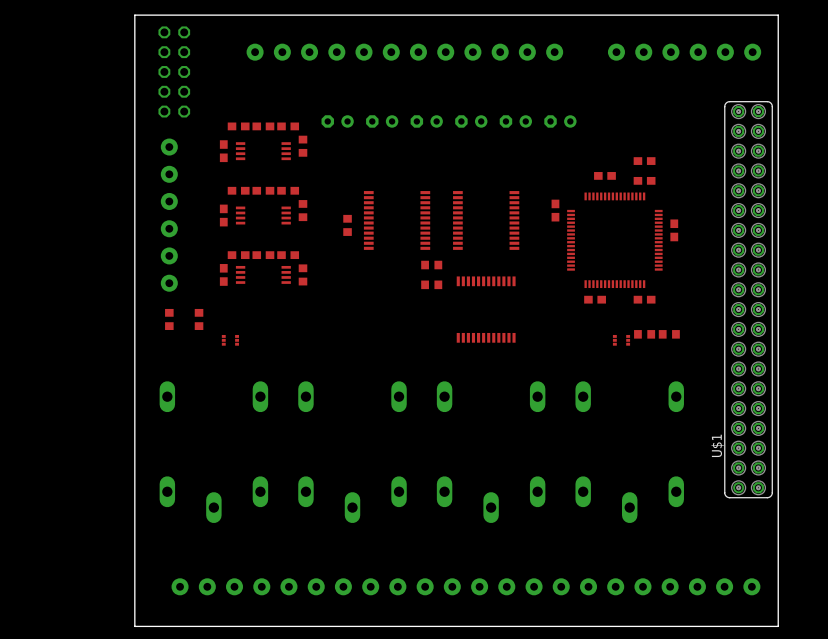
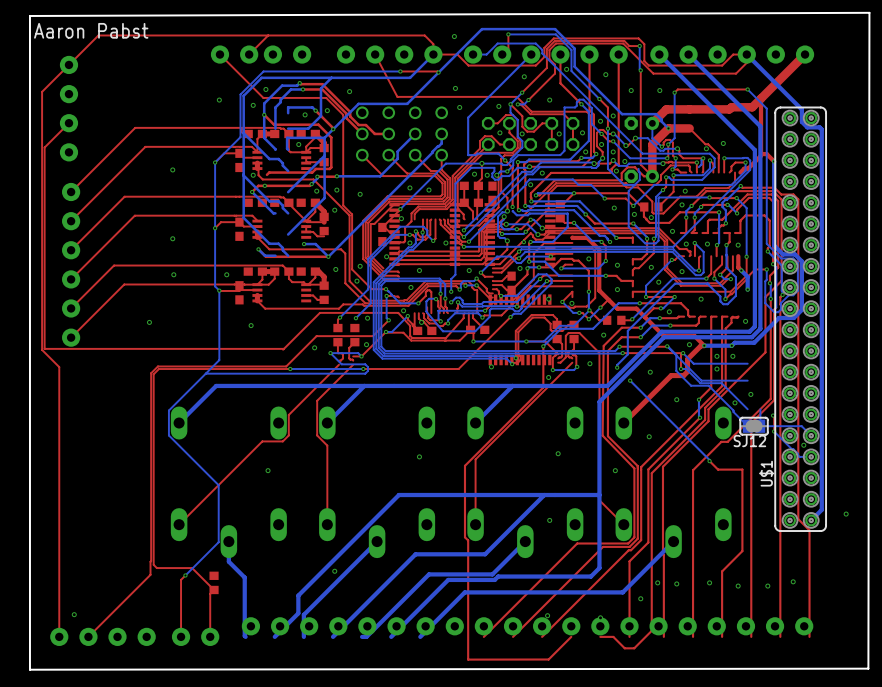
board edge: (778, 15) (134, 15) (134, 626) (778, 626) (778, 15) -> (869, 12) (868, 668) (29, 669) (29, 15) (869, 12)
text: none -> Aaron Pabst (91, 30)
top track: none -> (508, 34) (508, 48) (502, 54)
bottom track: none -> (508, 34) (555, 34) (571, 49) (571, 71) (599, 99)
via: none -> (508, 34)
top track: none -> (268, 35) (249, 54)
via: none -> (454, 36)
top track: none -> (639, 46) (629, 46) (624, 40) (554, 40) (546, 48) (546, 67) (522, 92)
bottom track: none -> (639, 46) (640, 70)
via: none -> (639, 46)
top track: none -> (219, 54) (263, 97) (326, 97) (343, 114) (343, 205) (352, 214) (352, 269) (371, 289) (386, 289)
part: none -> (234, 54)
part position: (323, 52) -> (360, 54)
top track: none -> (375, 54) (397, 96) (516, 96) (531, 111) (586, 111) (590, 115) (590, 158) (582, 166) (529, 166)
part position: (377, 52) -> (418, 54)
bottom track: none -> (433, 54) (410, 77) (261, 77) (243, 95) (243, 217) (269, 243) (278, 243) (288, 255)
part: (432, 52) -> none
bottom track: none -> (473, 54) (486, 54) (497, 43) (535, 43) (542, 49) (542, 53) (642, 153) (709, 153) (714, 158) (714, 167) (702, 179) (671, 179) (666, 177)
part: none -> (487, 54)
part: (486, 52) -> none
bottom track: none -> (531, 54) (468, 117) (468, 155) (498, 153) (505, 160)
part: none -> (545, 54)
top track: none -> (560, 54) (560, 83) (581, 104)
part: (541, 52) -> none
top track: none -> (589, 54) (589, 110) (593, 114) (593, 151) (596, 154)
part: none -> (604, 54)
top track: none -> (618, 54) (618, 164) (616, 164) (610, 172)
bottom track: none -> (659, 54) (754, 150) (754, 326) (749, 331) (661, 331) (607, 385) (216, 385) (179, 423)
bottom track: none -> (688, 54) (760, 126) (760, 328) (751, 337) (664, 337) (599, 401) (599, 568) (590, 576) (498, 576) (494, 579) (448, 579) (391, 636)
bottom track: none -> (746, 54) (801, 109) (801, 121) (807, 127) (819, 127) (821, 129) (821, 509) (811, 520)
top track: none -> (805, 54) (752, 107) (731, 107) (729, 109) (666, 109) (652, 123)
via: none -> (566, 69)
top track: none -> (400, 71) (438, 72)
bottom track: none -> (400, 71) (263, 71) (240, 94) (240, 137) (215, 162) (215, 286) (219, 290) (219, 360) (168, 410) (168, 435) (218, 485) (218, 542) (185, 575)
via: none -> (400, 71)
top track: none -> (640, 70) (640, 164) (652, 176)
via: none -> (640, 70)
via: none -> (438, 72)
via: none -> (605, 74)
part: (174, 71) -> none
via: none -> (524, 76)
bottom track: none -> (331, 77) (320, 88) (320, 115) (308, 128) (288, 128)
part: none -> (68, 79)
top track: none -> (299, 83) (322, 84) (350, 111) (350, 116) (358, 125) (365, 125) (374, 133) (388, 133)
bottom track: none -> (299, 83) (297, 85) (282, 85) (264, 103) (264, 137) (275, 149)
via: none -> (299, 83)
via: none -> (455, 88)
via: none -> (265, 89)
top track: none -> (302, 89) (322, 89) (346, 113) (346, 118) (362, 133)
bottom track: none -> (302, 89) (291, 89) (280, 99) (275, 107) (275, 128)
via: none -> (302, 89)
top track: none -> (747, 89) (677, 89) (674, 92)
bottom track: none -> (747, 89) (766, 108) (766, 243) (781, 258) (793, 258) (797, 263) (797, 290) (793, 295) (788, 295) (780, 303) (780, 309) (778, 312) (774, 312) (765, 303) (766, 269)
via: none -> (747, 89)
via: none -> (631, 90)
via: none -> (659, 90)
via: none -> (349, 91)
bottom track: none -> (522, 92) (510, 104) (510, 112) (517, 119) (517, 136) (522, 141) (522, 147) (507, 165) (445, 163) (400, 209)
via: none -> (522, 92)
bottom track: none -> (674, 92) (674, 138) (668, 144)
via: none -> (674, 92)
top track: none -> (599, 99) (607, 107) (607, 128)
via: none -> (599, 99)
top track: none -> (761, 98) (761, 155) (748, 168) (744, 168) (740, 172)
via: none -> (219, 100)
top track: none -> (528, 100) (554, 73) (554, 64) (549, 59) (549, 49) (555, 43) (623, 43) (653, 73) (736, 73) (746, 62) (746, 54) (733, 54) (722, 65) (648, 65) (644, 61) (644, 44) (638, 38) (553, 38) (544, 47) (544, 57) (535, 65) (468, 65) (457, 54) (433, 54) (433, 44) (424, 35) (98, 35) (42, 91) (42, 349) (59, 367) (59, 636)
bottom track: none -> (528, 100) (524, 104) (517, 104)
via: none -> (528, 100)
via: none -> (549, 100)
top track: none -> (510, 104) (522, 116) (522, 126) (527, 131) (534, 131) (542, 123) (551, 123) (551, 144)
via: none -> (510, 104)
top track: none -> (517, 104) (520, 104) (530, 114) (563, 114) (572, 123) (572, 144)
via: none -> (517, 104)
bottom track: none -> (581, 104) (588, 111) (588, 140) (570, 159) (529, 159) (526, 162) (517, 162)
via: none -> (581, 104)
via: none -> (253, 105)
via: none -> (498, 106)
via: none -> (459, 107)
top track: none -> (315, 110) (333, 129)
bottom track: none -> (315, 110) (312, 107) (288, 107) (288, 113)
via: none -> (315, 110)
via: none -> (327, 110)
top track: none -> (264, 114) (274, 124) (318, 124) (331, 137) (329, 168) (315, 168) (312, 172) (269, 172) (266, 174)
via: none -> (264, 114)
via: none -> (305, 114)
via: none -> (613, 115)
via: none -> (600, 121)
part footprint: [321, 115, 354, 128] -> [355, 106, 369, 162]
part footprint: [366, 115, 399, 128] -> [408, 106, 422, 162]
top track: none -> (68, 123) (44, 147) (44, 348) (283, 348)
top track: none -> (488, 123) (497, 123) (506, 115) (512, 115) (517, 119) (517, 137) (520, 140) (520, 149) (513, 155) (504, 155) (501, 158) (501, 191) (507, 197) (507, 211)
top track: none -> (509, 123) (509, 132) (517, 141) (517, 147) (512, 152) (483, 152) (457, 178) (457, 208) (463, 214) (464, 219)
part: none -> (641, 123)
bottom track: none -> (652, 123) (652, 138) (661, 146)
top track: none -> (242, 127) (241, 132)
part: (426, 121) -> none
part: (471, 121) -> none
part: (515, 121) -> none
part: (560, 121) -> none
bottom track: none -> (607, 128) (607, 168) (624, 184) (634, 184)
via: none -> (607, 128)
bottom track: none -> (668, 128) (656, 114) (622, 114) (574, 66) (574, 48) (555, 29) (481, 29) (407, 103) (358, 103) (324, 137)
via: none -> (668, 128)
top track: none -> (689, 128) (718, 154) (718, 158)
top track: none -> (689, 128) (668, 128) (652, 144) (652, 176)
via: none -> (333, 129)
bottom track: none -> (243, 133) (269, 159) (278, 159) (288, 171)
via: none -> (499, 132)
via: none -> (582, 132)
top track: none -> (274, 133) (262, 133) (257, 138) (257, 152) (251, 146) (145, 146) (71, 221)
part: none -> (388, 133)
bottom track: none -> (415, 133) (397, 151) (397, 158) (380, 176) (336, 176)
bottom track: none -> (441, 133) (441, 143) (328, 256) (315, 244) (304, 244)
part: none -> (441, 133)
via: none -> (522, 133)
part: none -> (530, 133)
via: none -> (559, 133)
top track: none -> (601, 133) (608, 141) (613, 141)
bottom track: none -> (601, 133) (591, 124) (591, 108) (583, 99) (579, 99) (575, 107) (564, 107) (564, 150) (560, 155) (518, 155) (513, 160) (513, 165) (507, 171) (500, 171) (496, 175)
via: none -> (601, 133)
top track: none -> (613, 133) (607, 133) (603, 129) (596, 132) (596, 146) (602, 151) (602, 158)
bottom track: none -> (613, 133) (625, 145)
via: none -> (613, 133)
top track: none -> (317, 135) (306, 146) (306, 152)
top track: none -> (317, 135) (324, 142) (324, 148) (310, 148) (306, 152)
part: none -> (68, 137)
bottom track: none -> (324, 137) (287, 137) (288, 149)
bottom track: none -> (324, 137) (324, 198) (288, 234)
top track: none -> (635, 138) (625, 145)
bottom track: none -> (635, 138) (647, 138) (660, 150) (677, 148)
via: none -> (635, 138)
bottom track: none -> (613, 141) (630, 158) (667, 158)
via: none -> (613, 141)
via: none -> (723, 143)
via: none -> (298, 144)
top track: none -> (488, 144) (455, 177) (455, 200) (446, 209) (419, 209) (414, 213) (414, 219)
top track: none -> (509, 144) (499, 144) (491, 136) (484, 136) (480, 141) (480, 148) (452, 175) (452, 199) (445, 206) (418, 206) (411, 213) (411, 221) (405, 227) (405, 241) (399, 243)
via: none -> (601, 144)
top track: none -> (668, 144) (667, 158)
via: none -> (668, 144)
via: none -> (625, 145)
top track: none -> (661, 146) (666, 139) (670, 139) (672, 142) (672, 155) (675, 158)
via: none -> (661, 146)
top track: none -> (677, 148) (683, 158) (703, 158) (702, 172)
via: none -> (677, 148)
via: none -> (706, 148)
top track: none -> (306, 152) (290, 152) (288, 150) (288, 133) (280, 127) (135, 127) (71, 192)
via: none -> (585, 151)
via: none -> (613, 151)
bottom track: none -> (596, 154) (592, 157) (581, 157)
via: none -> (596, 154)
top track: none -> (761, 154) (766, 154) (774, 161)
bottom track: none -> (324, 155) (288, 192)
top track: none -> (362, 155) (383, 176) (435, 176) (442, 183) (442, 194) (440, 196) (387, 196) (363, 220) (363, 258) (384, 279) (399, 280)
top track: none -> (388, 155) (407, 173) (436, 173) (445, 182) (445, 196) (442, 198) (388, 198) (365, 221) (365, 257) (383, 275) (399, 276)
top track: none -> (415, 155) (431, 171) (439, 171) (447, 179) (447, 197) (443, 201) (389, 201) (368, 222) (368, 256) (382, 271) (399, 272)
top track: none -> (441, 155) (441, 169) (450, 178) (450, 198) (444, 204) (394, 204) (374, 223) (370, 223) (370, 255) (383, 268)
top track: none -> (718, 156) (718, 172)
top track: none -> (257, 157) (243, 157) (239, 153) (224, 153) (215, 162)
top track: none -> (306, 157) (306, 163) (324, 162)
top track: none -> (581, 157) (578, 161) (527, 161) (524, 164) (525, 205)
via: none -> (581, 157)
bottom track: none -> (602, 158) (595, 168) (539, 167) (532, 174) (526, 174) (463, 237)
via: none -> (602, 158)
via: none -> (667, 158)
bottom track: none -> (675, 158) (675, 166) (672, 169)
via: none -> (675, 158)
bottom track: none -> (703, 158) (698, 167)
via: none -> (703, 158)
top track: none -> (724, 158) (724, 172)
bottom track: none -> (724, 158) (747, 157) (750, 160) (750, 169) (673, 246) (463, 246)
via: none -> (724, 158)
top track: none -> (505, 160) (512, 167) (512, 206)
via: none -> (505, 160)
top track: none -> (613, 160) (610, 163) (594, 163)
bottom track: none -> (613, 160) (618, 165) (626, 165) (629, 163) (662, 163)
via: none -> (613, 160)
top track: none -> (710, 160) (713, 163) (713, 172)
bottom track: none -> (710, 160) (710, 168) (703, 175) (673, 175)
via: none -> (710, 160)
top track: none -> (517, 162) (518, 210)
via: none -> (517, 162)
via: none -> (624, 161)
bottom track: none -> (774, 161) (774, 245) (783, 254) (794, 254) (801, 261) (801, 309) (793, 317) (778, 317) (754, 342) (734, 342) (731, 345) (704, 345)
via: none -> (774, 161)
via: none -> (215, 162)
top track: none -> (257, 163) (258, 175) (262, 179) (313, 179) (349, 215) (349, 281) (369, 300) (406, 300) (425, 281) (468, 281) (474, 290) (477, 290) (476, 312)
top track: none -> (481, 163) (481, 178) (478, 181) (477, 219)
via: none -> (481, 163)
via: none -> (696, 162)
top track: none -> (745, 162) (735, 162) (729, 172)
bottom track: none -> (745, 162) (745, 171) (731, 184) (654, 184) (633, 205)
via: none -> (745, 162)
bottom track: none -> (594, 163) (540, 162) (531, 171) (522, 171) (463, 230)
via: none -> (594, 163)
top track: none -> (662, 163) (669, 161) (696, 162) (697, 172)
via: none -> (662, 163)
bottom track: none -> (529, 166) (517, 167) (509, 176) (502, 176) (498, 179) (492, 177) (494, 167) (471, 167) (455, 183) (455, 274) (451, 279) (451, 291)
via: none -> (529, 166)
bottom track: none -> (638, 168) (639, 179) (628, 190) (628, 226) (645, 243) (655, 243) (658, 240) (659, 197) (709, 197)
top track: none -> (672, 169) (686, 172)
via: none -> (672, 169)
via: none -> (172, 169)
part: (169, 160) -> none
via: none -> (507, 171)
via: none -> (616, 171)
part: (644, 161) -> none
top track: none -> (610, 172) (551, 172) (530, 193) (531, 201)
top track: none -> (691, 172) (688, 165) (670, 165) (660, 175) (660, 179) (655, 184) (556, 183) (510, 229) (486, 229) (484, 231) (484, 256) (480, 260) (399, 260)
top track: none -> (735, 172) (735, 181) (728, 188) (705, 188) (696, 196) (680, 196) (663, 213) (652, 212) (652, 201) (638, 187) (557, 185) (548, 194) (548, 209) (525, 231)
via: none -> (542, 173)
via: none -> (474, 174)
bottom track: none -> (243, 175) (269, 201) (278, 201) (288, 213)
via: none -> (253, 175)
via: none -> (487, 175)
top track: none -> (496, 175) (498, 177) (498, 207) (479, 225) (458, 225) (456, 219)
via: none -> (496, 175)
top track: none -> (673, 175) (673, 191) (658, 207)
via: none -> (673, 175)
bottom track: none -> (317, 176) (311, 184)
via: none -> (317, 176)
top track: none -> (336, 176) (317, 176)
via: none -> (336, 176)
part: none -> (641, 176)
top track: none -> (652, 176) (643, 176) (634, 167) (627, 167) (621, 173) (621, 180) (554, 180) (539, 195) (535, 195)
top track: none -> (666, 177) (666, 186) (662, 190)
via: none -> (666, 177)
top track: none -> (311, 184) (309, 185) (258, 185) (252, 192)
via: none -> (311, 184)
via: none -> (530, 184)
via: none -> (264, 185)
top track: none -> (464, 185) (464, 202) (473, 211) (473, 219)
part: none -> (471, 185)
part: (604, 175) -> none
top track: none -> (740, 186) (742, 187) (774, 187) (781, 194) (793, 194) (798, 199) (798, 519) (809, 530) (809, 636)
bottom track: none -> (740, 186) (722, 202) (722, 206) (725, 210) (725, 223)
via: none -> (740, 186)
via: none -> (409, 187)
via: none -> (336, 190)
via: none -> (428, 190)
bottom track: none -> (662, 190) (656, 197) (656, 236) (653, 238)
via: none -> (662, 190)
via: none -> (316, 191)
via: none -> (685, 191)
bottom track: none -> (252, 192) (275, 213)
via: none -> (252, 192)
part: (644, 180) -> none
part: none -> (492, 193)
bottom track: none -> (574, 193) (538, 193) (535, 195)
via: none -> (574, 193)
via: none -> (360, 194)
via: none -> (535, 195)
top track: none -> (709, 197) (736, 198)
via: none -> (709, 197)
top track: none -> (604, 198) (625, 198) (633, 205)
bottom track: none -> (604, 198) (591, 184) (578, 184) (572, 179) (529, 179) (468, 241)
via: none -> (604, 198)
bottom track: none -> (736, 198) (746, 208) (746, 256)
via: none -> (736, 198)
bottom track: none -> (531, 201) (579, 201) (616, 237)
via: none -> (531, 201)
part: none -> (471, 202)
top track: none -> (560, 204) (563, 204) (574, 193) (628, 193) (643, 209)
via: none -> (682, 204)
top track: none -> (727, 204) (703, 204) (701, 207)
bottom track: none -> (727, 204) (737, 213)
via: none -> (727, 204)
bottom track: none -> (525, 205) (577, 205) (585, 214)
via: none -> (525, 205)
via: none -> (633, 205)
top track: none -> (691, 205) (706, 191) (773, 191) (781, 199) (781, 280) (765, 297) (765, 352) (708, 409) (708, 421) (662, 466) (663, 636)
bottom track: none -> (691, 205) (686, 211) (686, 217)
via: none -> (691, 205)
part: none -> (71, 206)
via: none -> (512, 206)
top track: none -> (644, 207) (643, 216) (649, 222) (669, 222) (679, 212) (719, 212)
part: none -> (651, 207)
bottom track: none -> (701, 207) (694, 213) (694, 217)
via: none -> (701, 207)
via: none -> (614, 208)
top track: none -> (400, 209) (382, 227) (392, 235) (399, 235)
via: none -> (400, 209)
via: none -> (334, 210)
bottom track: none -> (518, 210) (574, 210) (599, 235) (604, 235) (610, 241)
via: none -> (518, 210)
bottom track: none -> (507, 211) (502, 212) (498, 216) (498, 235) (507, 240)
via: none -> (507, 211)
bottom track: none -> (512, 211) (516, 215) (567, 213) (567, 227) (552, 241) (530, 241)
part: none -> (560, 211)
bottom track: none -> (719, 212) (719, 243) (716, 245)
via: none -> (719, 212)
top track: none -> (737, 213) (737, 209) (748, 197) (769, 197) (773, 201) (773, 264)
via: none -> (737, 213)
top track: none -> (585, 214) (594, 223) (633, 223)
via: none -> (585, 214)
via: none -> (634, 214)
top track: none -> (504, 216) (497, 224) (484, 224) (479, 229) (478, 251) (399, 251)
bottom track: none -> (504, 216) (501, 226) (504, 229) (508, 229)
via: none -> (504, 216)
via: none -> (651, 217)
top track: none -> (686, 217) (686, 232) (680, 232)
via: none -> (686, 217)
top track: none -> (694, 217) (694, 229) (691, 232) (697, 232)
via: none -> (694, 217)
via: none -> (401, 218)
top track: none -> (560, 218) (564, 222) (574, 222)
top track: none -> (423, 219) (422, 232)
top track: none -> (427, 219) (427, 234) (420, 237) (415, 231)
top track: none -> (431, 219) (430, 234) (425, 239) (417, 239) (412, 234) (409, 234)
top track: none -> (435, 219) (435, 238) (433, 240)
top track: none -> (439, 219) (440, 224) (463, 246)
top track: none -> (443, 219) (444, 224) (462, 241) (465, 241)
top track: none -> (448, 219) (448, 223) (463, 237)
top track: none -> (530, 219) (521, 229) (516, 229)
bottom track: none -> (530, 219) (533, 219) (542, 228)
via: none -> (530, 219)
top track: none -> (257, 220) (252, 215) (134, 215) (71, 279)
top track: none -> (306, 221) (315, 211) (315, 202) (324, 211) (324, 222) (307, 222) (288, 203) (283, 197) (280, 196) (124, 196) (71, 250)
bottom track: none -> (574, 222) (592, 240) (601, 241)
via: none -> (574, 222)
top track: none -> (725, 223) (718, 228) (718, 232) (713, 232)
via: none -> (725, 223)
top track: none -> (506, 224) (501, 224) (498, 226) (485, 226) (481, 230) (481, 253) (479, 255) (399, 255)
bottom track: none -> (506, 224) (527, 224) (537, 234)
via: none -> (506, 224)
part: (555, 210) -> none
bottom track: none -> (633, 223) (647, 238)
via: none -> (633, 223)
top track: none -> (257, 226) (243, 226) (239, 222) (221, 222) (215, 228)
top track: none -> (306, 226) (306, 231) (313, 231) (317, 236) (324, 236)
via: none -> (215, 228)
top track: none -> (542, 228) (658, 228) (679, 249) (690, 251) (689, 256)
via: none -> (542, 228)
part: (169, 215) -> none
bottom track: none -> (516, 229) (508, 229)
via: none -> (516, 229)
via: none -> (463, 230)
bottom track: none -> (415, 231) (415, 243) (411, 247) (408, 247) (373, 282) (373, 349) (382, 358) (506, 358) (512, 364)
via: none -> (415, 231)
bottom track: none -> (525, 231) (523, 234) (502, 234)
via: none -> (525, 231)
via: none -> (672, 231)
top track: none -> (257, 231) (257, 237) (269, 249) (341, 249) (345, 253) (345, 283) (365, 303) (408, 302) (427, 283) (466, 283) (465, 285)
bottom track: none -> (422, 232) (422, 240) (412, 249) (409, 249) (376, 283) (376, 348) (383, 356) (513, 356) (515, 358)
via: none -> (422, 232)
top track: none -> (502, 234) (499, 231) (486, 233) (486, 260) (482, 264) (399, 264)
via: none -> (502, 234)
top track: none -> (702, 232) (707, 232) (709, 219) (722, 219) (747, 194) (771, 194) (778, 201) (778, 267) (769, 275) (769, 283)
top track: none -> (724, 232) (729, 232) (729, 242) (726, 245)
top track: none -> (735, 232) (740, 232) (740, 220) (745, 215) (764, 215) (769, 220) (769, 246) (767, 251)
part: none -> (382, 234)
bottom track: none -> (409, 234) (395, 234) (370, 259) (370, 303) (355, 318)
via: none -> (409, 234)
top track: none -> (537, 234) (544, 234) (548, 230) (657, 230) (667, 240) (667, 268) (682, 283) (720, 283) (732, 270) (732, 256)
via: none -> (537, 234)
via: none -> (463, 237)
top track: none -> (572, 237) (587, 237) (599, 249) (599, 290) (617, 308) (636, 308) (664, 336) (694, 336) (704, 345) (701, 345) (687, 359) (687, 371) (683, 375) (671, 375) (623, 423)
top track: none -> (616, 237) (632, 237) (632, 242)
via: none -> (616, 237)
via: none -> (172, 238)
top track: none -> (647, 238) (647, 253) (641, 259) (632, 259) (632, 264)
via: none -> (647, 238)
top track: none -> (653, 238) (653, 253) (638, 268) (632, 270) (632, 275)
via: none -> (653, 238)
part: (347, 225) -> none
bottom track: none -> (433, 240) (427, 234) (427, 230) (423, 226) (400, 226) (368, 258) (368, 289) (340, 317)
via: none -> (433, 240)
top track: none -> (507, 240) (507, 249) (497, 259) (492, 260)
via: none -> (507, 240)
via: none -> (468, 241)
via: none -> (523, 242)
top track: none -> (530, 241) (529, 261)
via: none -> (530, 241)
top track: none -> (601, 241) (605, 246) (605, 261)
via: none -> (601, 241)
via: none -> (610, 241)
via: none -> (409, 243)
via: none -> (445, 243)
top track: none -> (572, 242) (544, 242) (533, 253) (533, 279) (512, 300) (495, 300) (485, 310)
top track: none -> (694, 243) (694, 256)
bottom track: none -> (694, 243) (703, 251) (703, 272) (700, 275) (695, 275) (672, 251) (525, 251) (518, 258)
via: none -> (694, 243)
via: none -> (304, 244)
via: none -> (686, 244)
via: none -> (707, 244)
top track: none -> (716, 245) (716, 256)
via: none -> (716, 245)
part: (674, 230) -> none
bottom track: none -> (726, 245) (726, 267) (735, 277) (735, 295) (727, 304) (723, 304) (720, 301) (720, 296) (707, 283)
via: none -> (726, 245)
via: none -> (738, 245)
via: none -> (463, 246)
top track: none -> (572, 248) (592, 248) (595, 251) (595, 298) (586, 306) (516, 306)
top track: none -> (258, 249) (265, 256) (328, 256)
bottom track: none -> (258, 249) (264, 255) (275, 255)
via: none -> (258, 249)
top track: none -> (519, 251) (502, 268) (492, 268)
bottom track: none -> (519, 251) (521, 249) (673, 249) (694, 270) (698, 270)
via: none -> (519, 251)
bottom track: none -> (767, 251) (781, 265) (782, 294)
via: none -> (767, 251)
top track: none -> (572, 253) (553, 253) (550, 256)
part: (614, 240) -> none
top track: none -> (684, 256) (678, 256) (671, 259)
top track: none -> (700, 256) (698, 270)
top track: none -> (711, 256) (711, 273) (706, 278)
top track: none -> (722, 256) (722, 264) (714, 272) (714, 278)
top track: none -> (727, 256) (727, 267) (720, 274)
top track: none -> (738, 256) (738, 267) (741, 270)
via: none -> (328, 256)
via: none -> (386, 256)
bottom track: none -> (550, 256) (527, 256) (520, 263) (517, 263) (510, 256) (496, 256) (480, 272)
via: none -> (550, 256)
top track: none -> (746, 256) (746, 275) (730, 291) (632, 291) (632, 297)
via: none -> (746, 256)
top track: none -> (518, 258) (515, 258) (501, 272) (492, 272)
via: none -> (518, 258)
via: none -> (588, 258)
bottom track: none -> (671, 259) (646, 285) (646, 297)
via: none -> (671, 259)
bottom track: none -> (529, 261) (545, 261) (559, 275) (605, 275)
via: none -> (529, 261)
bottom track: none -> (605, 261) (598, 268) (561, 268)
via: none -> (605, 261)
part: none -> (71, 264)
top track: none -> (492, 264) (499, 264) (530, 233) (535, 239) (542, 239) (549, 233) (656, 233) (664, 241) (664, 269) (680, 285) (721, 285) (727, 279) (730, 279)
top track: none -> (572, 264) (565, 264) (561, 268)
bottom track: none -> (773, 264) (776, 267) (776, 307)
via: none -> (773, 264)
via: none -> (617, 265)
via: none -> (360, 266)
top track: none -> (539, 267) (552, 267) (561, 258) (578, 260) (588, 270) (588, 291)
bottom track: none -> (539, 267) (527, 268)
via: none -> (539, 267)
via: none -> (651, 267)
via: none -> (520, 268)
top track: none -> (527, 268) (527, 274) (511, 290) (507, 290) (501, 285) (492, 285)
via: none -> (527, 268)
via: none -> (561, 268)
via: none -> (335, 269)
top track: none -> (766, 269) (755, 269) (725, 299)
via: none -> (766, 269)
via: none -> (419, 270)
via: none -> (469, 270)
via: none -> (698, 270)
bottom track: none -> (741, 270) (747, 276) (747, 289)
via: none -> (741, 270)
via: none -> (682, 271)
top track: none -> (480, 272) (484, 276) (492, 276)
via: none -> (480, 272)
via: none -> (173, 274)
via: none -> (226, 274)
top track: none -> (572, 275) (543, 275) (540, 279)
bottom track: none -> (720, 274) (724, 279) (730, 279)
via: none -> (720, 274)
top track: none -> (511, 276) (507, 276) (502, 281) (492, 280)
top track: none -> (605, 275) (616, 275) (621, 280) (632, 280) (632, 286)
via: none -> (605, 275)
top track: none -> (476, 278) (488, 293) (492, 293)
bottom track: none -> (476, 278) (474, 281) (463, 281) (459, 289)
via: none -> (476, 278)
bottom track: none -> (706, 278) (672, 278) (632, 319)
via: none -> (706, 278)
bottom track: none -> (714, 278) (725, 289) (725, 299)
via: none -> (714, 278)
bottom track: none -> (540, 279) (517, 301) (463, 304) (459, 297) (456, 297) (451, 302)
via: none -> (540, 279)
via: none -> (730, 279)
top track: none -> (572, 280) (546, 281)
via: none -> (356, 281)
bottom track: none -> (546, 281) (518, 311) (512, 308) (491, 308) (489, 316) (475, 331) (442, 331) (426, 311) (426, 301) (429, 298) (436, 299)
via: none -> (546, 281)
part: (431, 265) -> none
via: none -> (658, 282)
bottom track: none -> (440, 283) (438, 281) (385, 281) (381, 285) (381, 346) (385, 351) (615, 351) (619, 346)
bottom track: none -> (440, 283) (440, 293)
part: none -> (511, 283)
bottom track: none -> (708, 283) (675, 283) (627, 330) (627, 354) (617, 365) (617, 367)
bottom track: none -> (769, 283) (770, 298)
via: none -> (769, 283)
top track: none -> (257, 284) (262, 279) (262, 271) (274, 271) (274, 278) (268, 284) (244, 284) (244, 284) (124, 284) (71, 337)
top track: none -> (308, 284) (315, 277) (315, 271) (318, 271) (324, 276) (324, 285) (306, 284) (303, 282) (292, 282) (288, 278) (288, 271) (282, 265) (114, 265) (71, 308)
top track: none -> (476, 285) (488, 297) (492, 297)
bottom track: none -> (476, 285) (465, 285)
via: none -> (476, 285)
via: none -> (465, 285)
top track: none -> (572, 286) (530, 286) (501, 315) (484, 315) (482, 317)
part: (169, 269) -> none
via: none -> (410, 287)
bottom track: none -> (386, 289) (400, 303) (418, 303)
via: none -> (386, 289)
top track: none -> (459, 289) (456, 286) (428, 286) (408, 305) (343, 304) (338, 308) (265, 308) (257, 300) (257, 295)
via: none -> (459, 289)
top track: none -> (492, 289) (496, 289) (501, 295)
via: none -> (617, 289)
via: none -> (747, 289)
via: none -> (219, 290)
top track: none -> (257, 290) (219, 290)
via: none -> (451, 291)
bottom track: none -> (588, 291) (589, 310) (574, 325) (559, 325) (544, 341) (473, 341)
via: none -> (588, 291)
top track: none -> (440, 293) (440, 305) (443, 308) (443, 313)
via: none -> (440, 293)
top track: none -> (782, 294) (780, 297) (780, 636)
via: none -> (782, 294)
top track: none -> (306, 295) (313, 295) (317, 299) (324, 299)
top track: none -> (386, 295) (399, 297)
bottom track: none -> (386, 295) (386, 318) (388, 320)
via: none -> (386, 295)
bottom track: none -> (501, 295) (516, 295) (538, 274) (546, 274) (551, 279) (551, 283) (520, 313) (513, 313) (510, 317)
via: none -> (501, 295)
via: none -> (646, 297)
top track: none -> (674, 297) (646, 297)
bottom track: none -> (674, 297) (663, 308) (660, 308)
via: none -> (674, 297)
top track: none -> (572, 297) (572, 291) (562, 301)
top track: none -> (436, 299) (438, 301) (439, 313)
via: none -> (436, 299)
top track: none -> (445, 298) (448, 313)
bottom track: none -> (445, 298) (445, 284) (439, 278) (384, 278) (378, 284) (378, 347) (384, 353) (622, 353)
via: none -> (445, 298)
via: none -> (548, 299)
via: none -> (701, 299)
via: none -> (725, 299)
top track: none -> (770, 298) (770, 398) (727, 441) (721, 441) (693, 470) (693, 636)
via: none -> (770, 298)
top track: none -> (608, 300) (600, 307)
via: none -> (451, 302)
top track: none -> (457, 302) (456, 313)
bottom track: none -> (457, 302) (462, 306) (516, 306)
via: none -> (457, 302)
bottom track: none -> (562, 301) (573, 312) (579, 312)
via: none -> (562, 301)
top track: none -> (418, 303) (425, 295) (425, 292) (429, 290) (431, 313)
via: none -> (418, 303)
part: (431, 284) -> none
via: none -> (571, 303)
top track: none -> (639, 303) (680, 303) (688, 310) (689, 316) (694, 316)
bottom track: none -> (639, 303) (618, 303) (593, 328) (560, 328) (543, 346)
via: none -> (639, 303)
via: none -> (516, 306)
top track: none -> (427, 307) (428, 318) (430, 320) (440, 321)
bottom track: none -> (600, 307) (588, 319)
via: none -> (600, 307)
top track: none -> (776, 307) (774, 309) (774, 400) (751, 423) (751, 636)
top track: none -> (660, 308) (653, 308) (644, 317)
via: none -> (660, 308)
via: none -> (403, 310)
bottom track: none -> (438, 310) (438, 319) (440, 321)
bottom track: none -> (485, 310) (438, 310)
via: none -> (485, 310)
top track: none -> (589, 310) (599, 320) (607, 320)
via: none -> (589, 310)
via: none -> (669, 311)
top track: none -> (579, 312) (582, 312) (588, 319)
via: none -> (579, 312)
top track: none -> (414, 313) (414, 326) (417, 330) (407, 319) (407, 316)
top track: none -> (418, 313) (418, 318) (431, 330)
top track: none -> (423, 313) (424, 318) (429, 323) (436, 323) (438, 326) (448, 323)
top track: none -> (464, 313) (463, 318) (445, 338) (412, 338) (410, 335) (410, 325) (398, 312) (319, 312) (283, 349)
top track: none -> (468, 313) (468, 328) (473, 332) (473, 341)
top track: none -> (473, 313) (473, 318) (484, 329)
bottom track: none -> (407, 316) (391, 331) (386, 331)
via: none -> (407, 316)
top track: none -> (510, 317) (458, 369) (363, 369)
via: none -> (510, 317)
top track: none -> (684, 316) (659, 318)
top track: none -> (705, 316) (700, 316) (696, 325) (670, 325)
top track: none -> (716, 316) (711, 316) (711, 387) (698, 399)
top track: none -> (727, 316) (722, 316) (722, 386) (641, 467) (641, 540) (542, 636)
top track: none -> (732, 316) (731, 322) (725, 328) (725, 387) (705, 407) (705, 419) (651, 473) (651, 630) (634, 648) (624, 648) (613, 636) (600, 636)
top track: none -> (738, 316) (732, 317)
top track: none -> (340, 317) (337, 319) (337, 328)
via: none -> (340, 317)
via: none -> (355, 318)
via: none -> (367, 318)
bottom track: none -> (482, 317) (478, 313) (455, 313) (448, 320) (448, 323)
via: none -> (482, 317)
bottom track: none -> (659, 318) (650, 318) (640, 327)
via: none -> (659, 318)
via: none -> (588, 319)
top track: none -> (632, 319) (621, 320)
via: none -> (632, 319)
part: (595, 299) -> none
part: (644, 299) -> none
top track: none -> (388, 320) (372, 336) (316, 336) (286, 366) (157, 366) (151, 373) (150, 574) (88, 636)
via: none -> (388, 320)
part: none -> (614, 320)
via: none -> (440, 321)
via: none -> (745, 321)
via: none -> (149, 322)
via: none -> (421, 322)
part: none -> (71, 323)
via: none -> (448, 323)
top track: none -> (557, 324) (557, 319) (552, 315) (531, 315) (515, 330) (515, 358)
top track: none -> (574, 324) (568, 324) (562, 330) (551, 330) (550, 323) (544, 317) (532, 317) (518, 331) (518, 354) (520, 360) (512, 364)
via: none -> (251, 325)
bottom track: none -> (670, 325) (652, 325) (640, 337)
via: none -> (670, 325)
top track: none -> (640, 327) (621, 327) (603, 345) (602, 435) (634, 468) (634, 537) (628, 543) (577, 543) (483, 636)
via: none -> (640, 327)
top track: none -> (470, 329) (459, 340) (445, 340)
part: none -> (477, 329)
part: none -> (424, 330)
top track: none -> (386, 331) (361, 356) (353, 356)
via: none -> (386, 331)
part: none -> (557, 331)
part: none -> (574, 331)
top track: none -> (385, 332) (403, 332) (411, 340) (444, 340)
part: none -> (337, 335)
part: none -> (354, 335)
via: none -> (603, 335)
top track: none -> (640, 337) (621, 337) (607, 351) (607, 436) (637, 466) (637, 538) (629, 546) (603, 546) (513, 636)
via: none -> (640, 337)
top track: none -> (557, 339) (562, 344) (562, 356) (558, 358)
top track: none -> (574, 339) (574, 348) (568, 352) (568, 356) (572, 358)
part: (169, 319) -> none
part: (199, 319) -> none
via: none -> (473, 341)
top track: none -> (526, 341) (545, 341) (558, 354)
via: none -> (526, 341)
top track: none -> (337, 342) (337, 353) (342, 354) (342, 358) (338, 360)
top track: none -> (354, 342) (349, 347) (349, 358) (353, 360)
via: none -> (366, 344)
via: none -> (689, 344)
via: none -> (704, 345)
via: none -> (731, 345)
top track: none -> (543, 346) (543, 387) (464, 465) (464, 537) (468, 540) (468, 659) (548, 659) (571, 636)
via: none -> (543, 346)
via: none -> (619, 346)
top track: none -> (667, 346) (619, 346)
bottom track: none -> (667, 346) (701, 380) (747, 380)
via: none -> (667, 346)
bottom track: none -> (667, 347) (676, 354) (676, 370) (691, 385) (708, 385) (747, 426)
via: none -> (314, 347)
via: none -> (330, 353)
top track: none -> (557, 353) (552, 357) (552, 370)
top track: none -> (622, 353) (683, 353) (680, 355) (680, 369)
via: none -> (622, 353)
bottom track: none -> (683, 353) (693, 363) (747, 363)
via: none -> (683, 353)
top track: none -> (572, 354) (576, 356) (577, 366)
bottom track: none -> (361, 356) (358, 353) (330, 353) (341, 364) (365, 364) (368, 367) (365, 373) (205, 373)
via: none -> (361, 356)
part: (644, 334) -> none
part: (669, 334) -> none
via: none -> (716, 356)
via: none -> (732, 356)
via: none -> (515, 358)
part: (230, 340) -> none
top track: none -> (558, 362) (565, 357) (565, 335) (568, 332) (579, 332) (599, 353) (599, 500) (623, 524)
top track: none -> (572, 362) (475, 459) (475, 524)
part: (621, 340) -> none
via: none -> (512, 364)
via: none -> (589, 363)
top track: none -> (338, 364) (288, 414) (288, 435) (282, 441) (262, 441) (179, 524)
top track: none -> (353, 364) (317, 400) (317, 435) (327, 445) (327, 524)
via: none -> (491, 366)
bottom track: none -> (577, 366) (574, 370) (552, 370)
via: none -> (577, 366)
via: none -> (617, 367)
top track: none -> (290, 369) (158, 369) (153, 374) (153, 564) (156, 568) (192, 568) (214, 589) (210, 593) (210, 636)
via: none -> (290, 369)
bottom track: none -> (363, 369) (290, 369)
via: none -> (363, 369)
bottom track: none -> (680, 369) (686, 369) (700, 383) (721, 383) (747, 409)
via: none -> (680, 369)
via: none -> (716, 369)
via: none -> (552, 370)
via: none -> (650, 372)
via: none -> (548, 377)
bottom track: none -> (630, 380) (709, 461)
via: none -> (630, 380)
bottom track: none -> (364, 385) (327, 423)
bottom track: none -> (512, 385) (475, 423)
via: none -> (750, 394)
via: none -> (676, 399)
bottom track: none -> (698, 399) (700, 417)
via: none -> (698, 399)
via: none -> (734, 402)
bottom track: none -> (760, 409) (760, 426) (801, 426) (811, 435)
top track: none -> (773, 415) (774, 431)
via: none -> (773, 415)
top track: none -> (700, 417) (648, 469) (648, 542) (629, 561) (629, 636)
via: none -> (700, 417)
SJ12: none -> (754, 426)
bottom track: none -> (774, 431) (799, 456) (811, 456)
via: none -> (774, 431)
via: none -> (649, 436)
via: none -> (803, 445)
via: none -> (558, 453)
via: none -> (419, 456)
top track: none -> (709, 461) (718, 469) (742, 469) (742, 551) (722, 571) (722, 636)
via: none -> (709, 461)
via: none -> (268, 470)
via: none -> (615, 470)
bottom track: none -> (544, 495) (485, 554) (415, 554) (333, 636)
bottom track: none -> (599, 495) (398, 495) (298, 595) (298, 613) (274, 636)
via: none -> (846, 514)
via: none -> (549, 520)
bottom track: none -> (228, 541) (228, 561) (244, 577) (245, 636)
bottom track: none -> (377, 541) (303, 614) (303, 636)
bottom track: none -> (525, 541) (492, 574) (428, 574) (366, 636) (362, 636)
bottom track: none -> (673, 541) (622, 592) (464, 592) (420, 636)
via: none -> (334, 571)
top track: none -> (185, 575) (181, 579) (181, 636)
via: none -> (185, 575)
via: none -> (793, 581)
part: none -> (214, 582)
via: none -> (657, 582)
via: none -> (709, 582)
via: none -> (676, 583)
via: none -> (738, 586)
via: none -> (767, 586)
via: none -> (640, 598)
via: none -> (74, 614)
via: none -> (547, 615)
via: none -> (600, 617)
part position: (193, 586) -> (195, 636)
part: none -> (73, 636)
part: none -> (132, 636)

